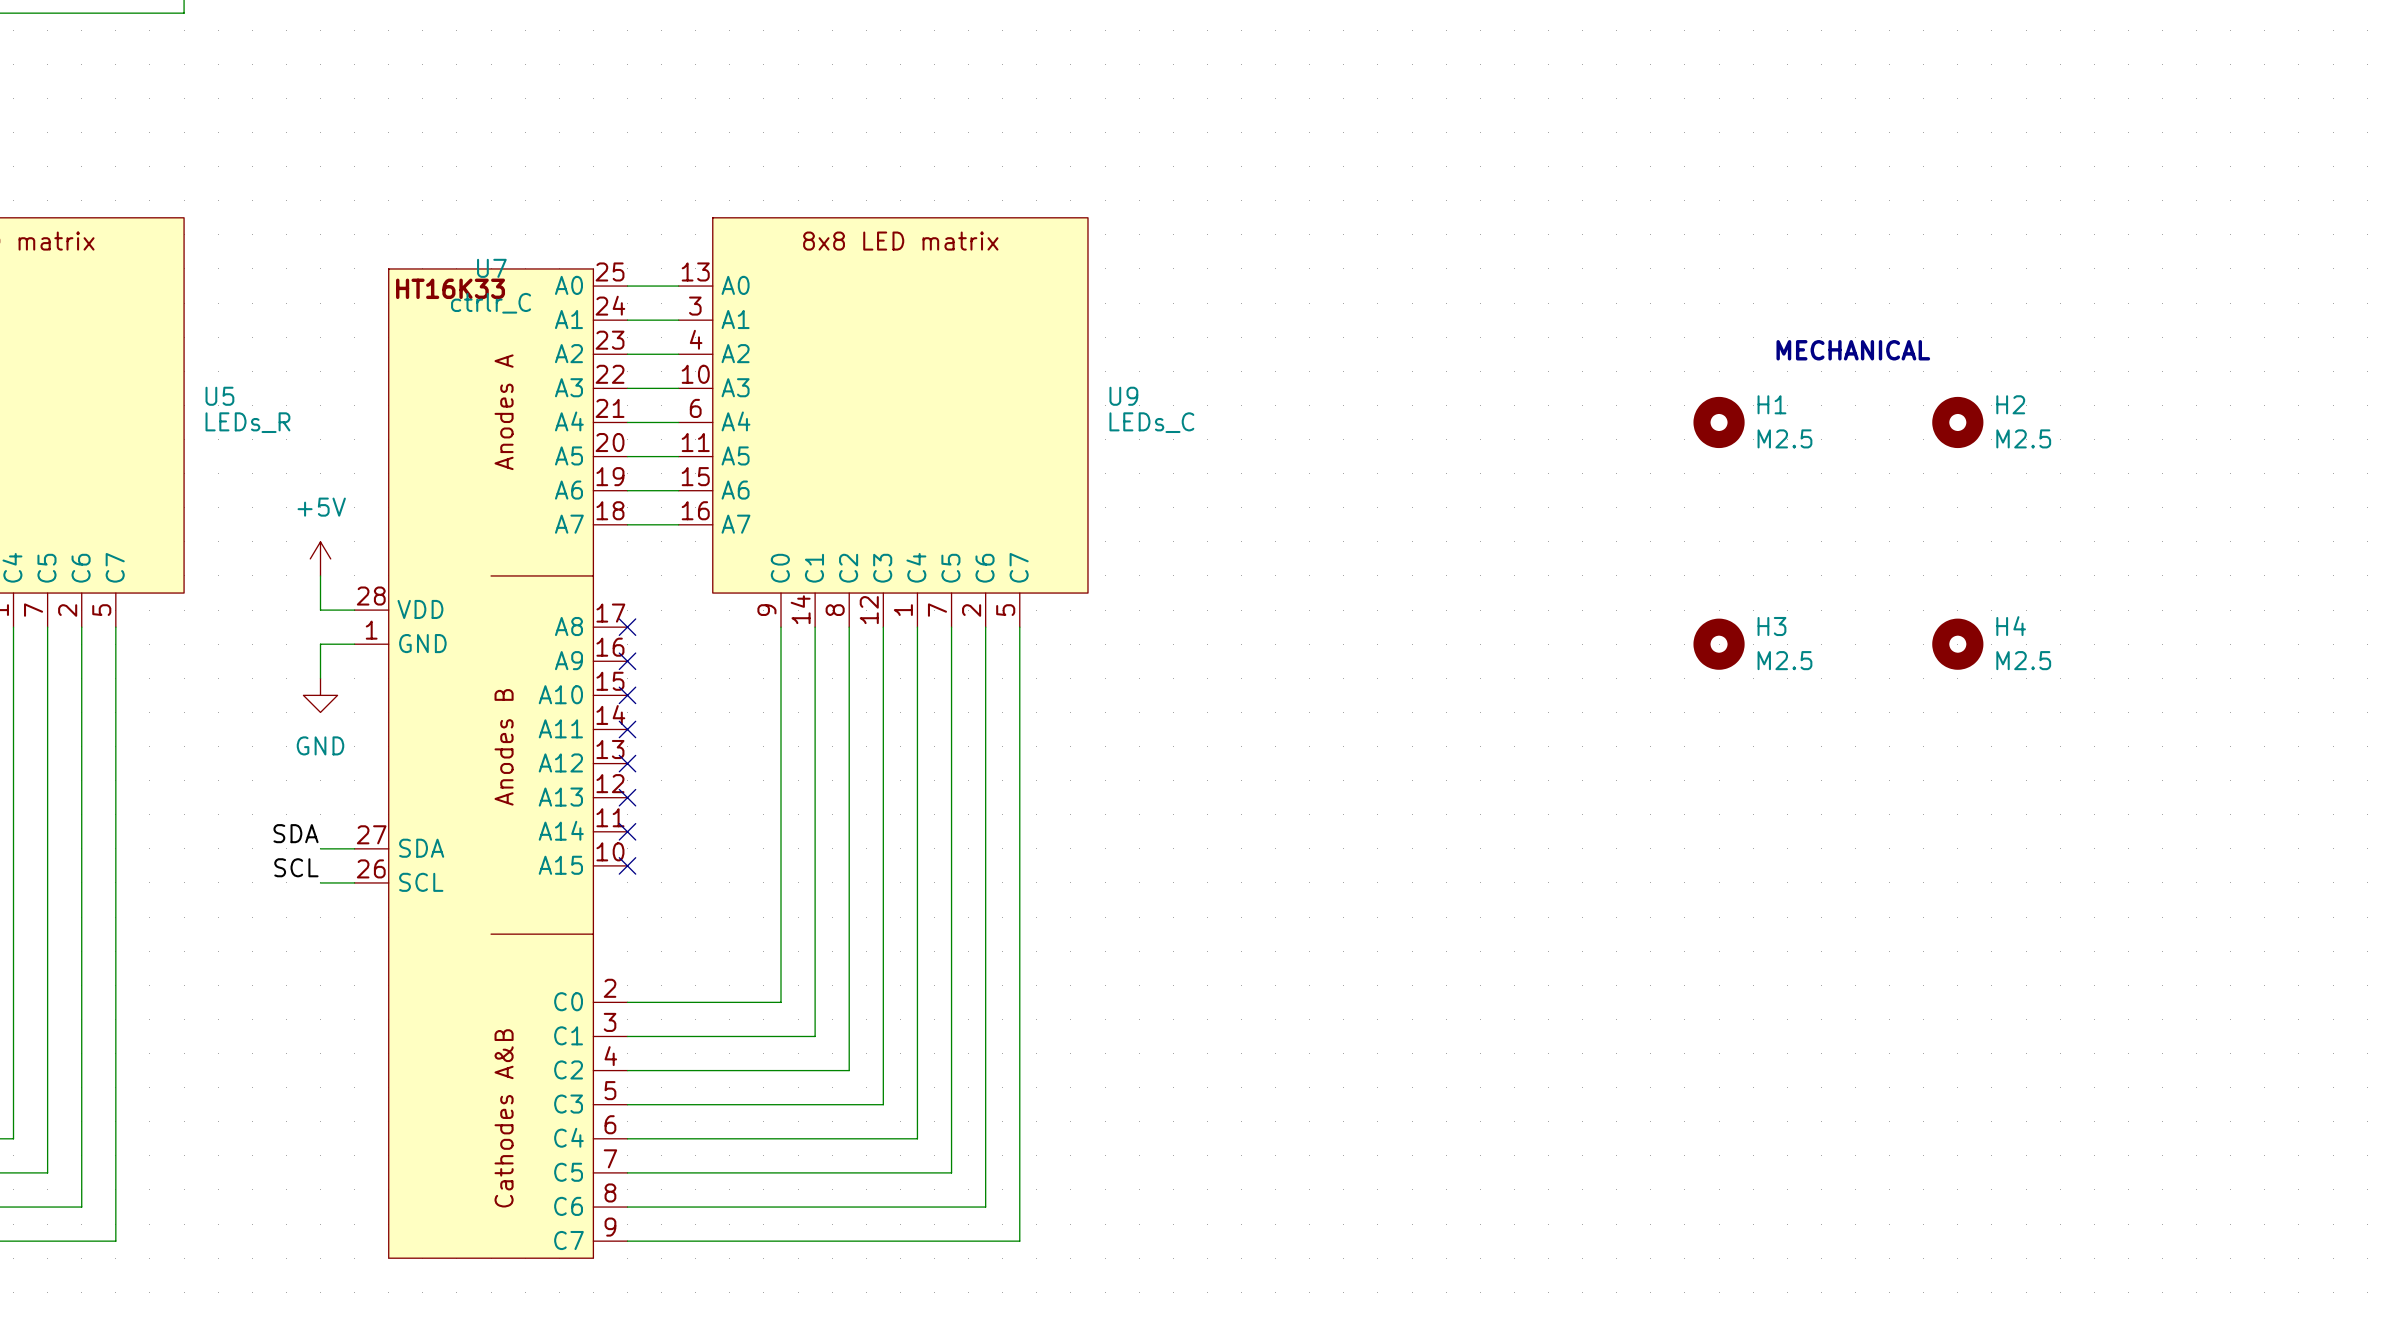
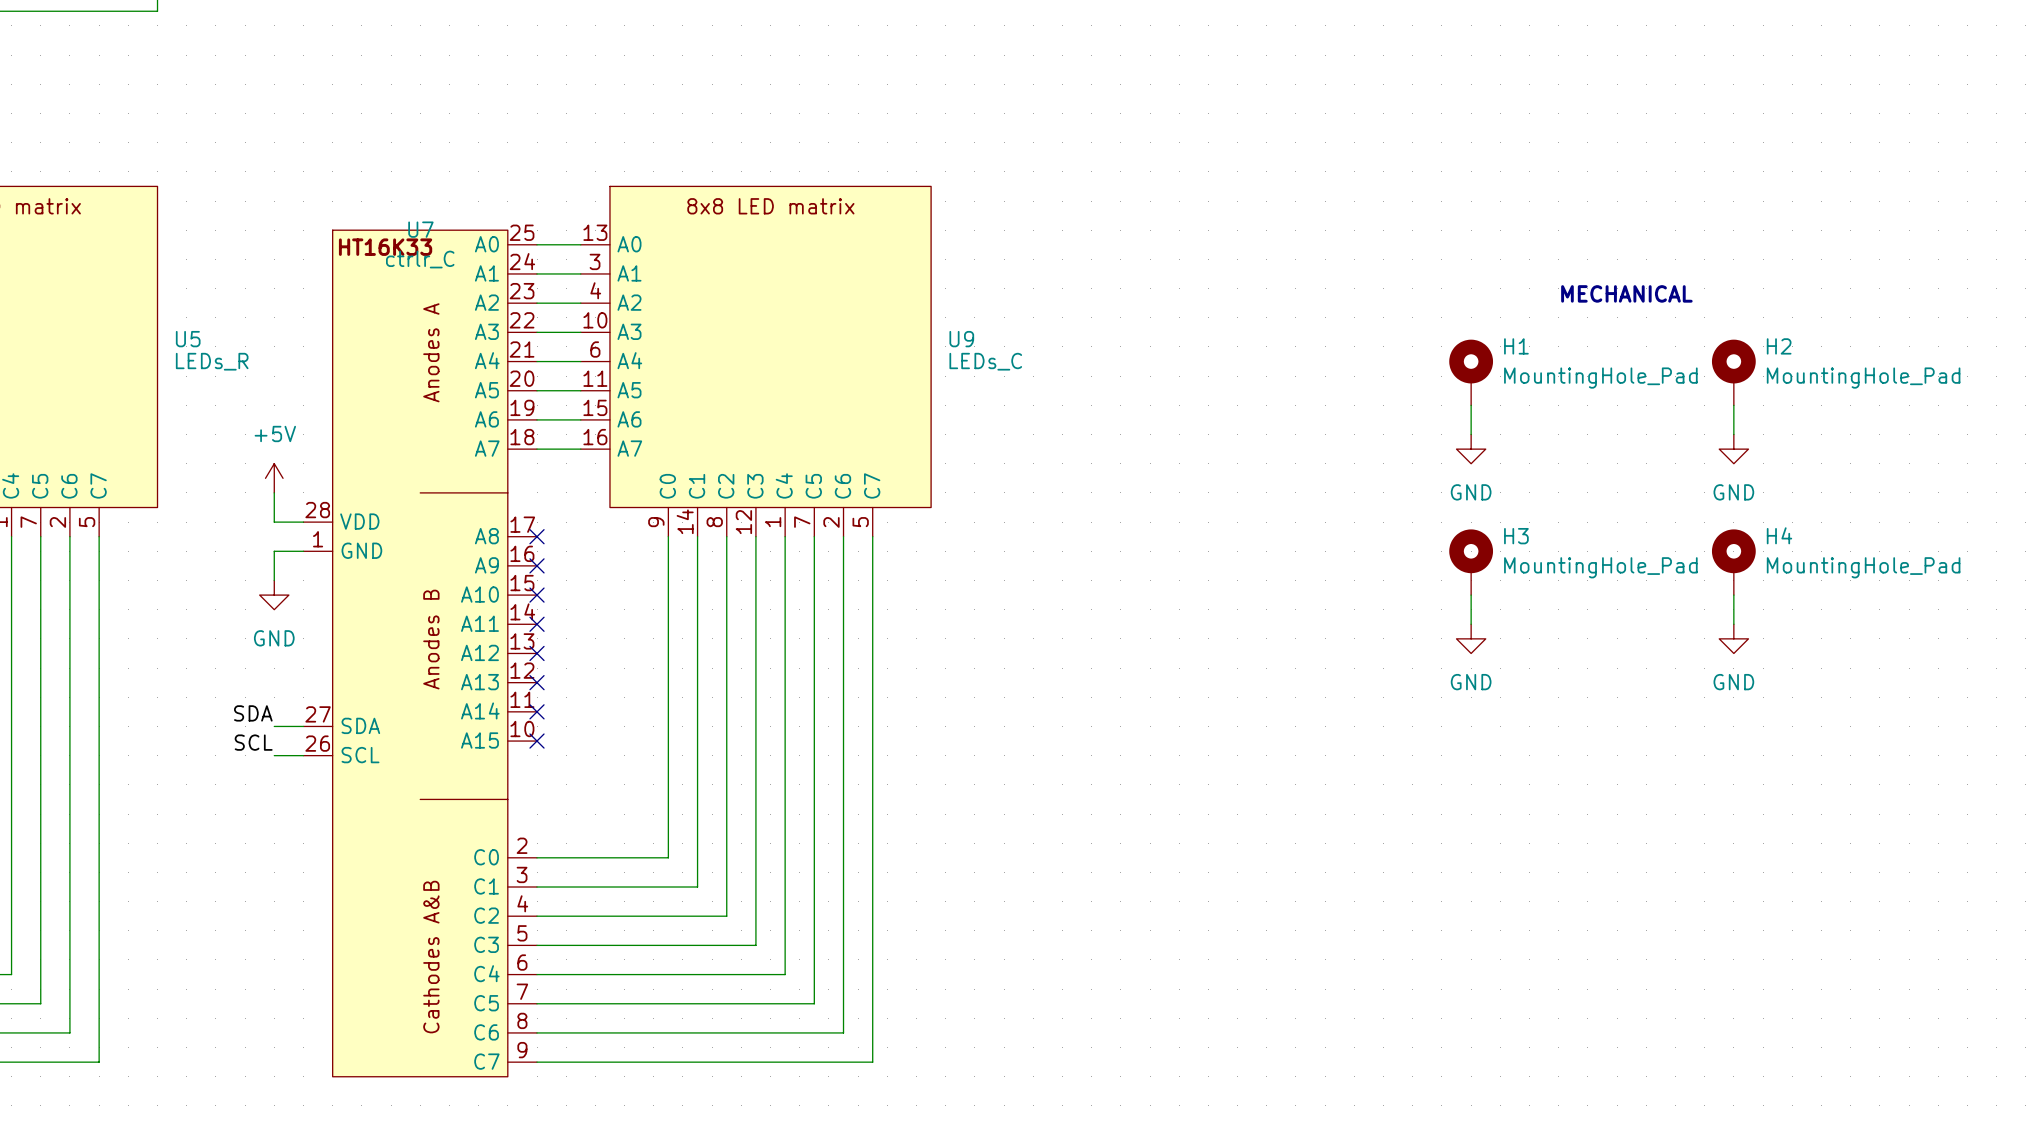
text position: MECHANICAL (1853, 350) -> MECHANICAL (1626, 293)
H1 symbol: [1693, 396, 1745, 449] -> [1449, 339, 1494, 406]
H2 symbol: [1932, 396, 1984, 449] -> [1711, 339, 1756, 406]
H1 value: M2.5 (1784, 438) -> MountingHole_Pad (1600, 378)
H2 value: M2.5 (2023, 438) -> MountingHole_Pad (1863, 378)
wire: none -> (1471, 405) (1471, 434)
wire: none -> (1733, 405) (1733, 434)
power symbol: none -> GND (1471, 449)
power symbol: none -> GND (1733, 449)
H3 symbol: [1693, 618, 1745, 670] -> [1449, 529, 1494, 596]
H4 symbol: [1932, 618, 1984, 670] -> [1711, 529, 1756, 596]
H3 value: M2.5 (1784, 660) -> MountingHole_Pad (1600, 567)
H4 value: M2.5 (2023, 660) -> MountingHole_Pad (1863, 567)
wire: none -> (1471, 595) (1471, 624)
wire: none -> (1733, 595) (1733, 624)
power symbol: none -> GND (1471, 638)
power symbol: none -> GND (1733, 638)

